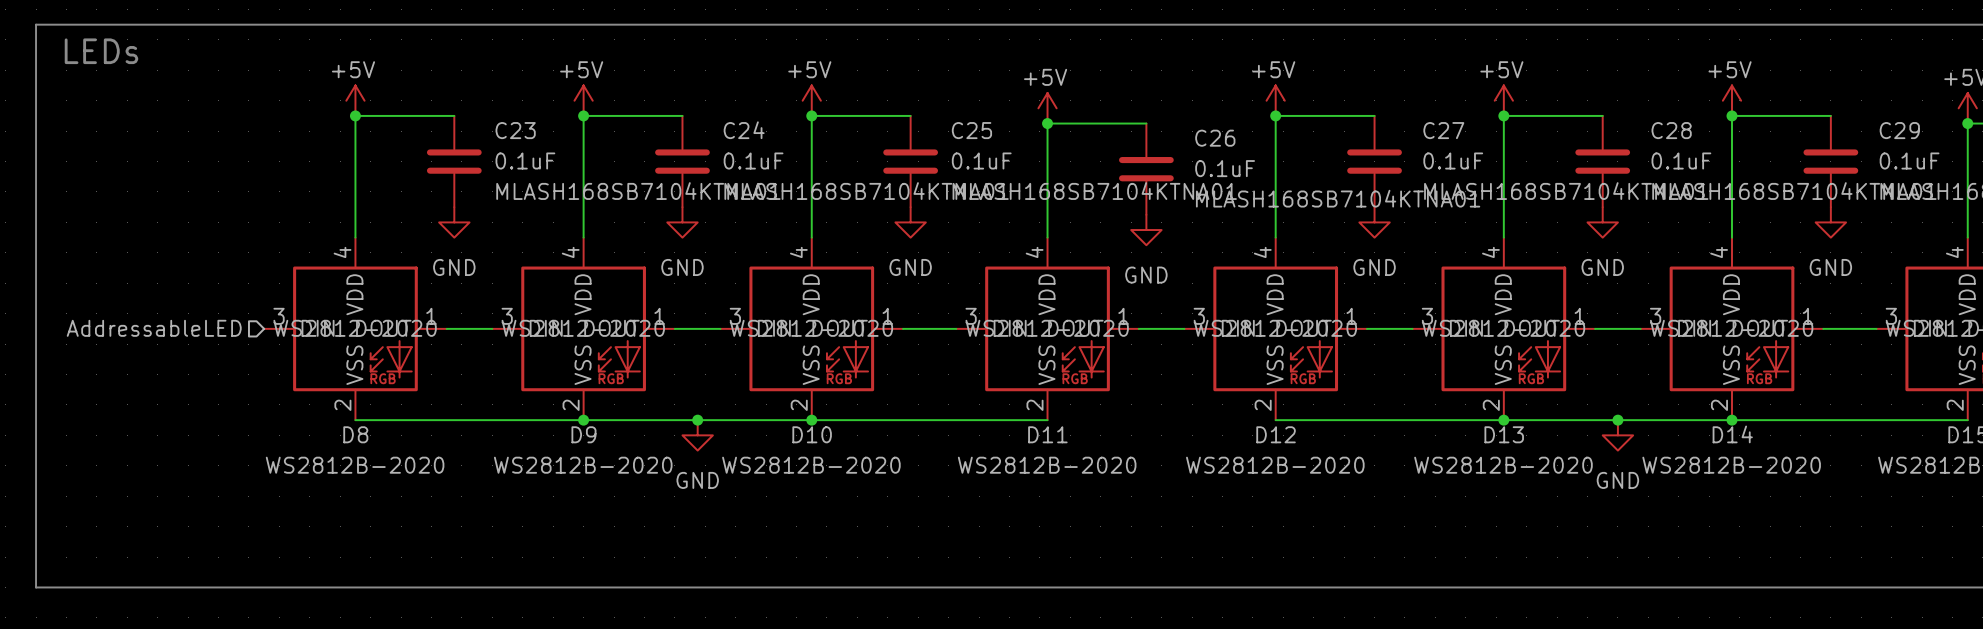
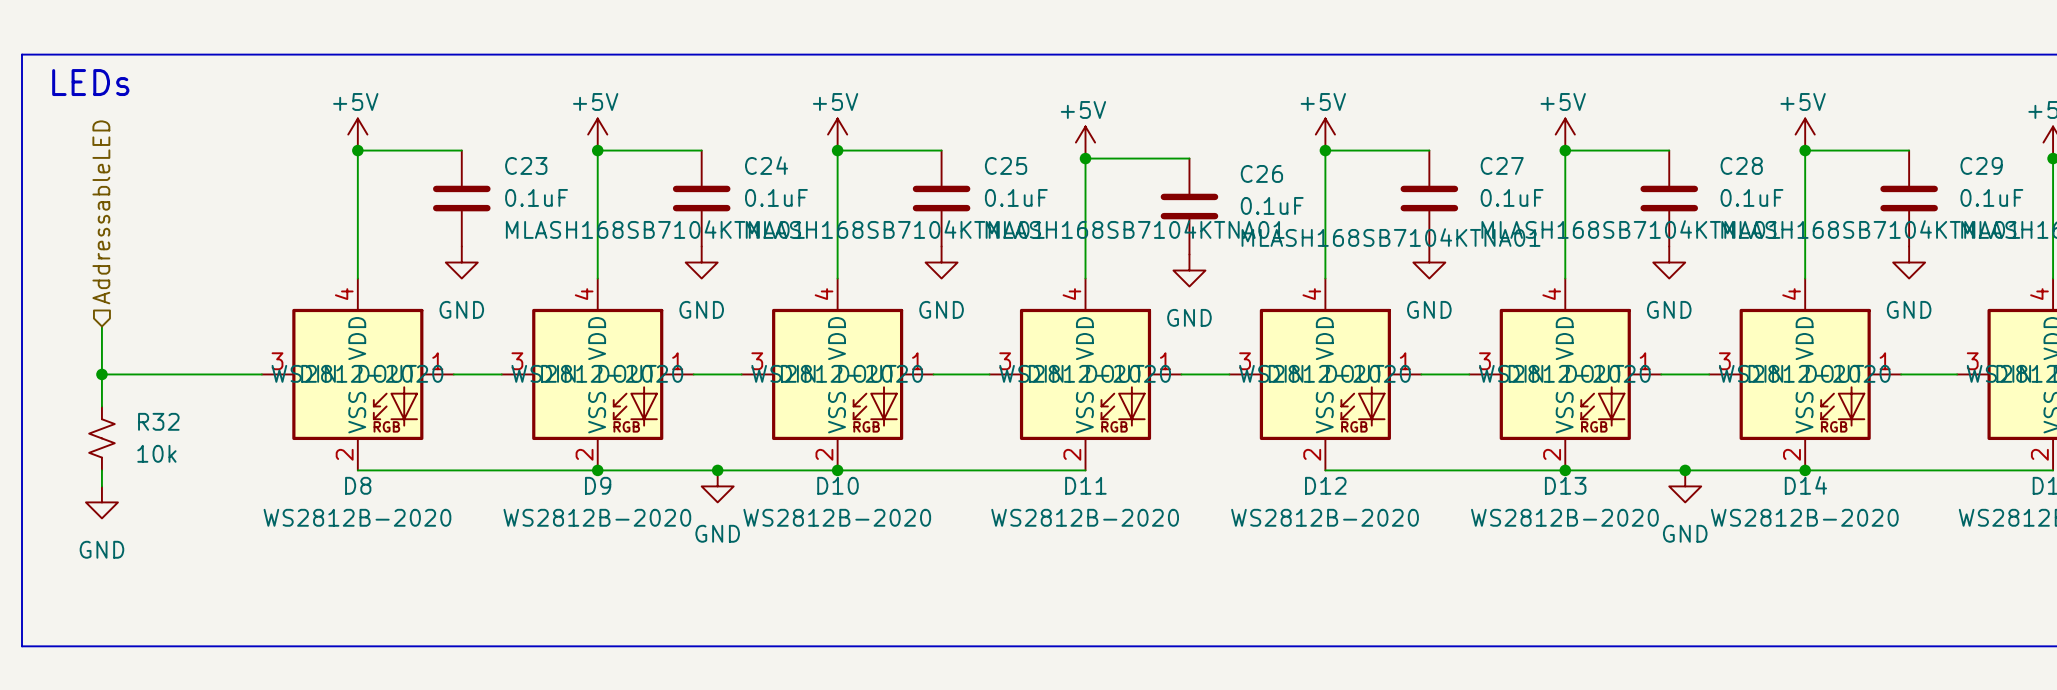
wire: none -> (101, 326) (101, 406)
wire: none -> (101, 374) (261, 374)
junction: none -> (101, 374)
hierarchical label rotation: 0° (154, 328) -> 90° clockwise (101, 212)
R32: none -> 10k (101, 438)
wire: none -> (101, 470) (101, 486)
power symbol: none -> GND (101, 502)

